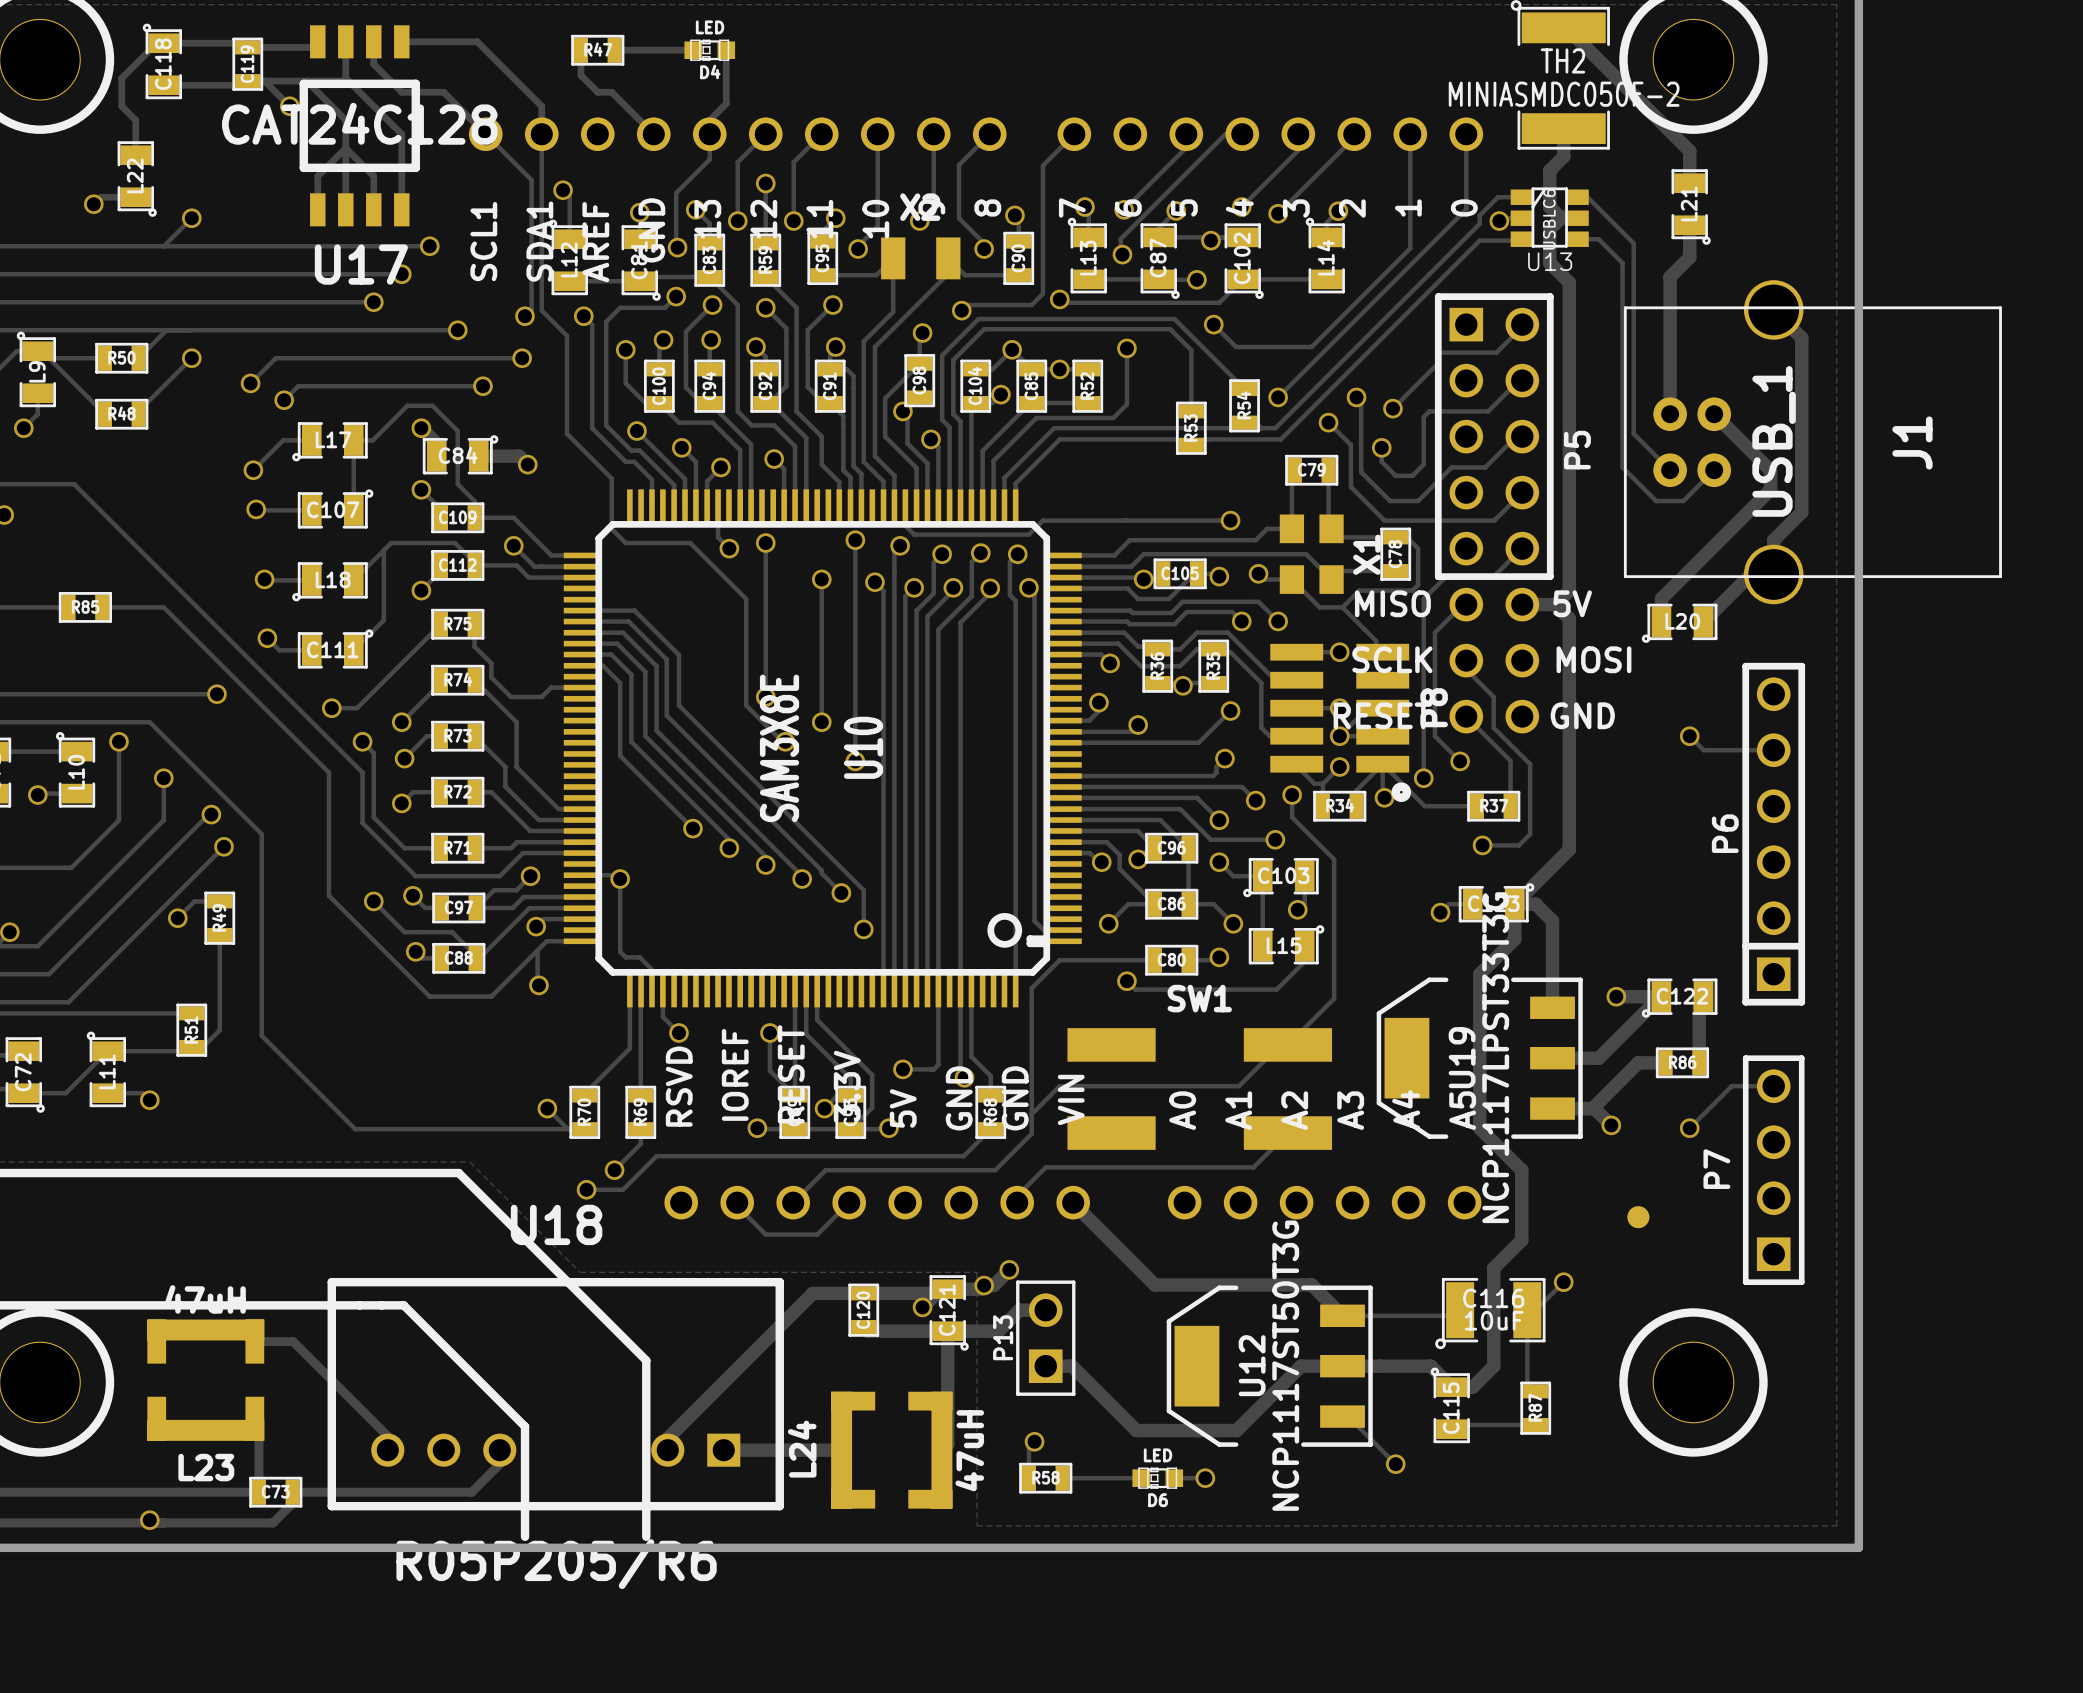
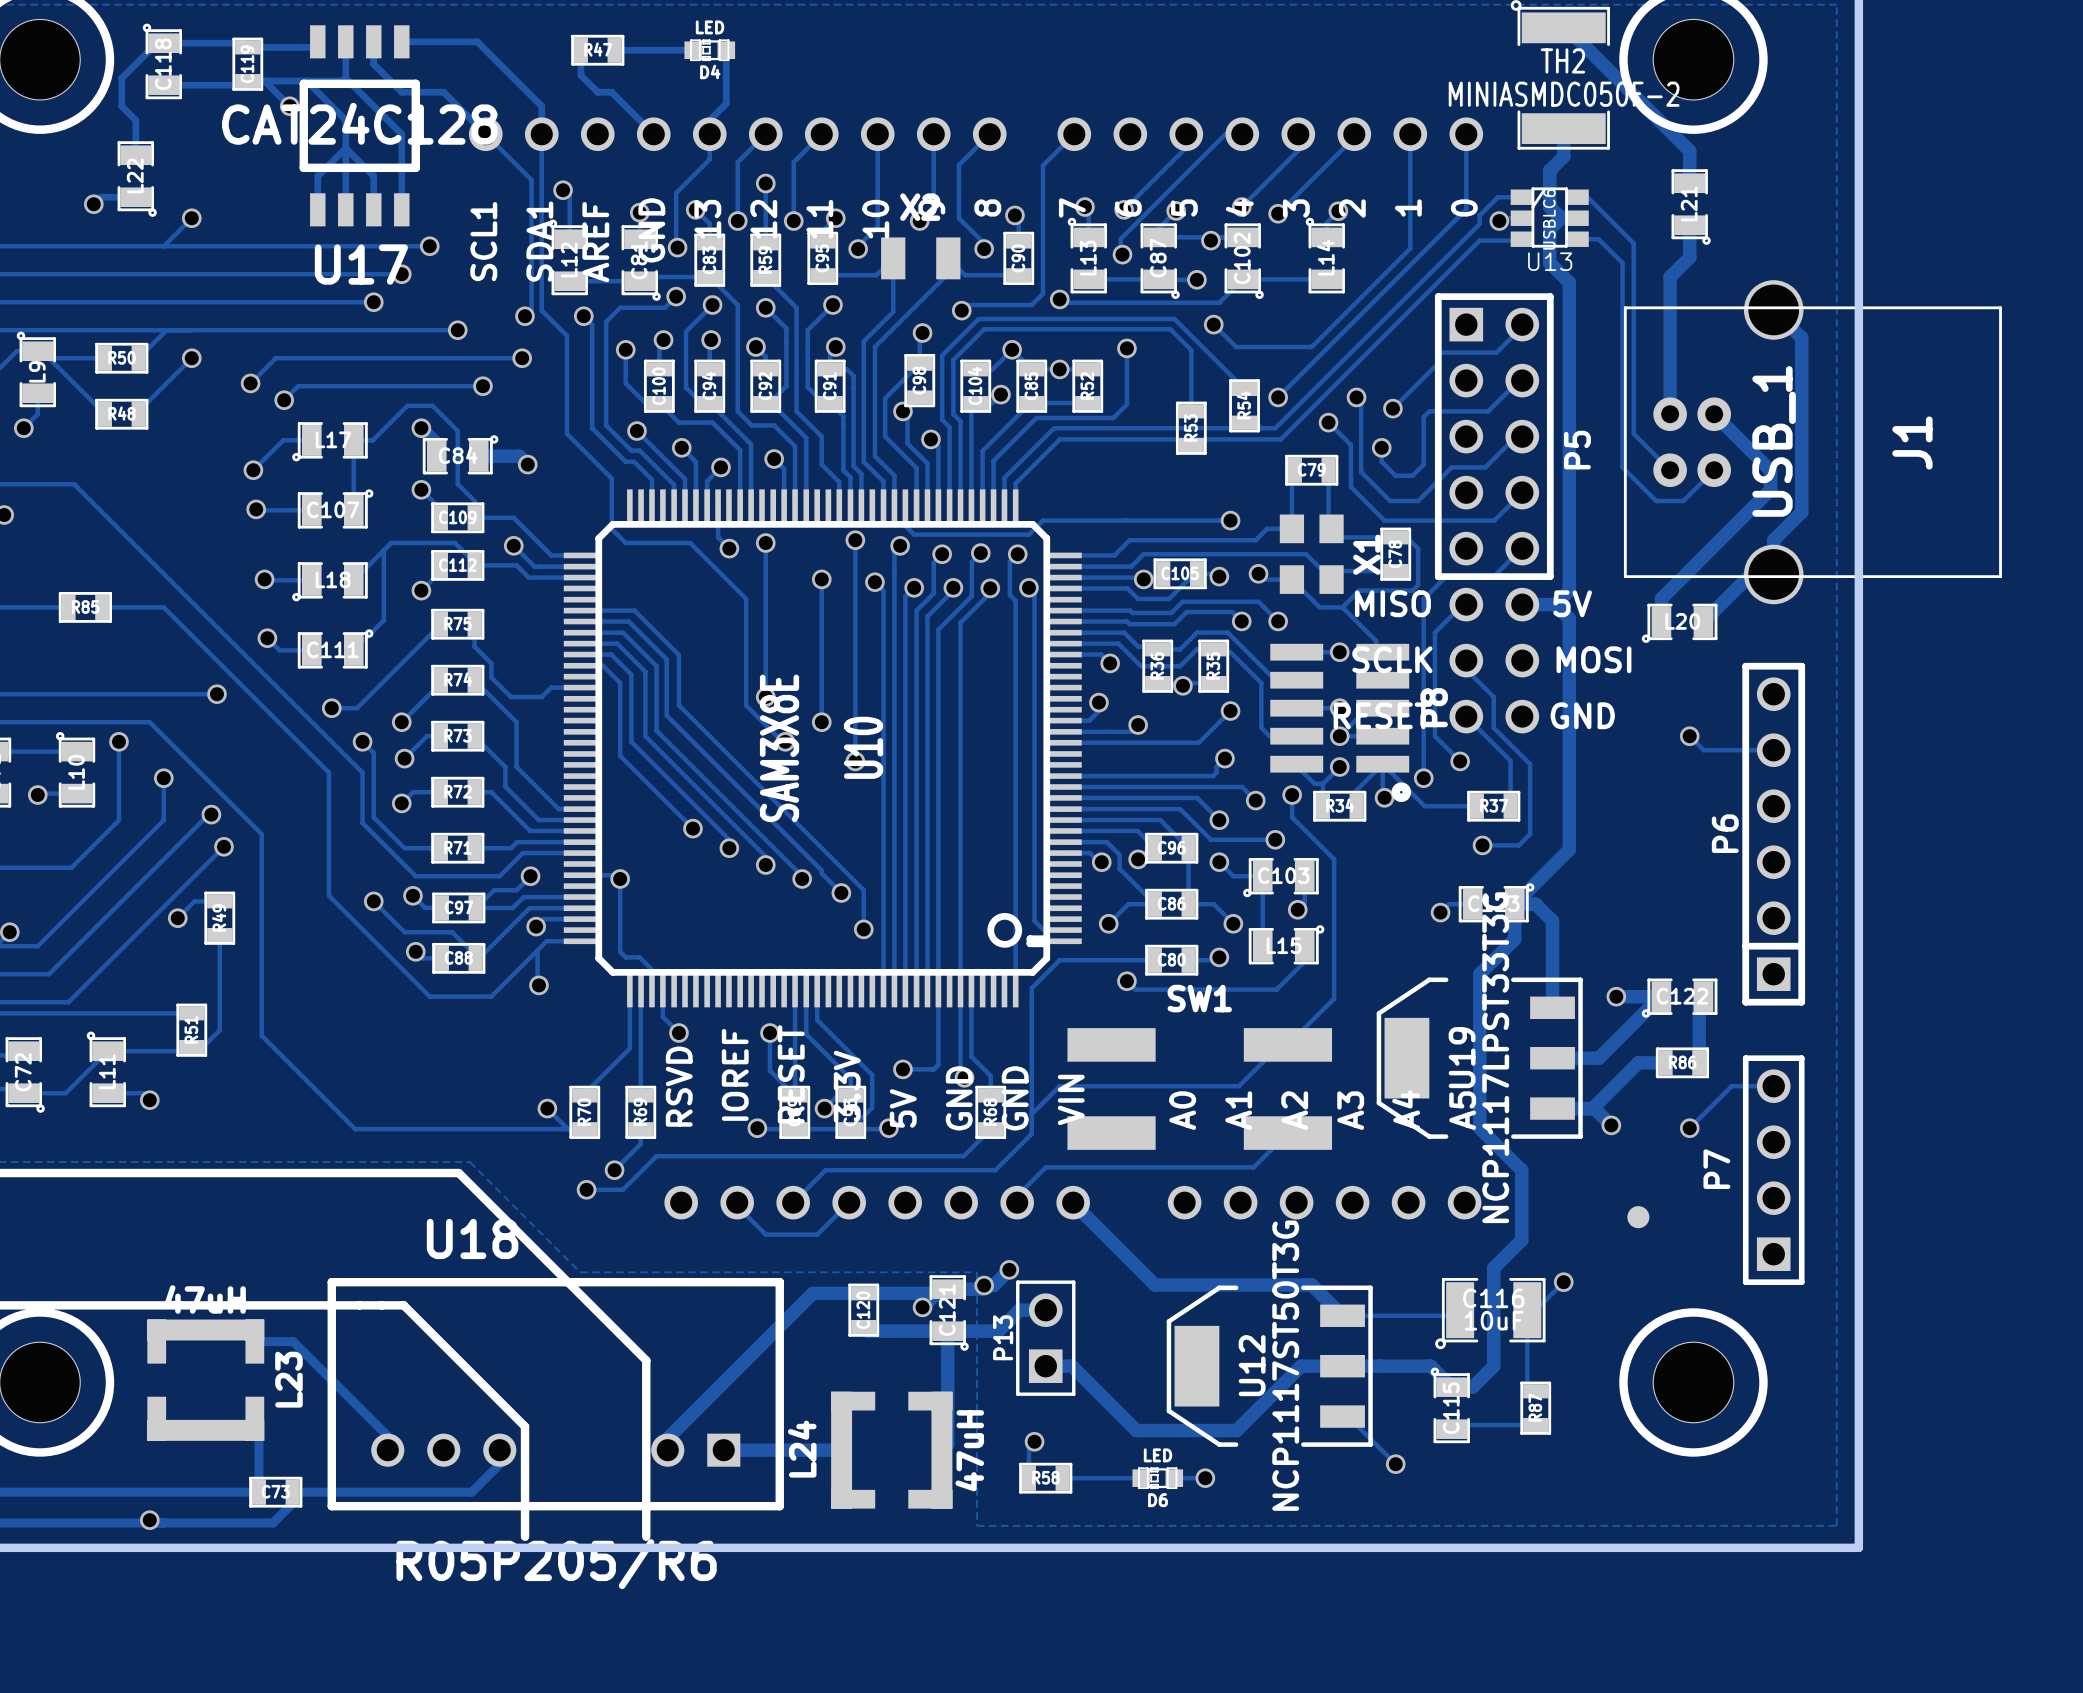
U18 name position: U18 (556, 1224) -> U18 (472, 1238)
L23 name rotation: 0° (206, 1467) -> 90° counterclockwise (288, 1379)
L23 name position: L23 (206, 1467) -> L23 (288, 1379)

